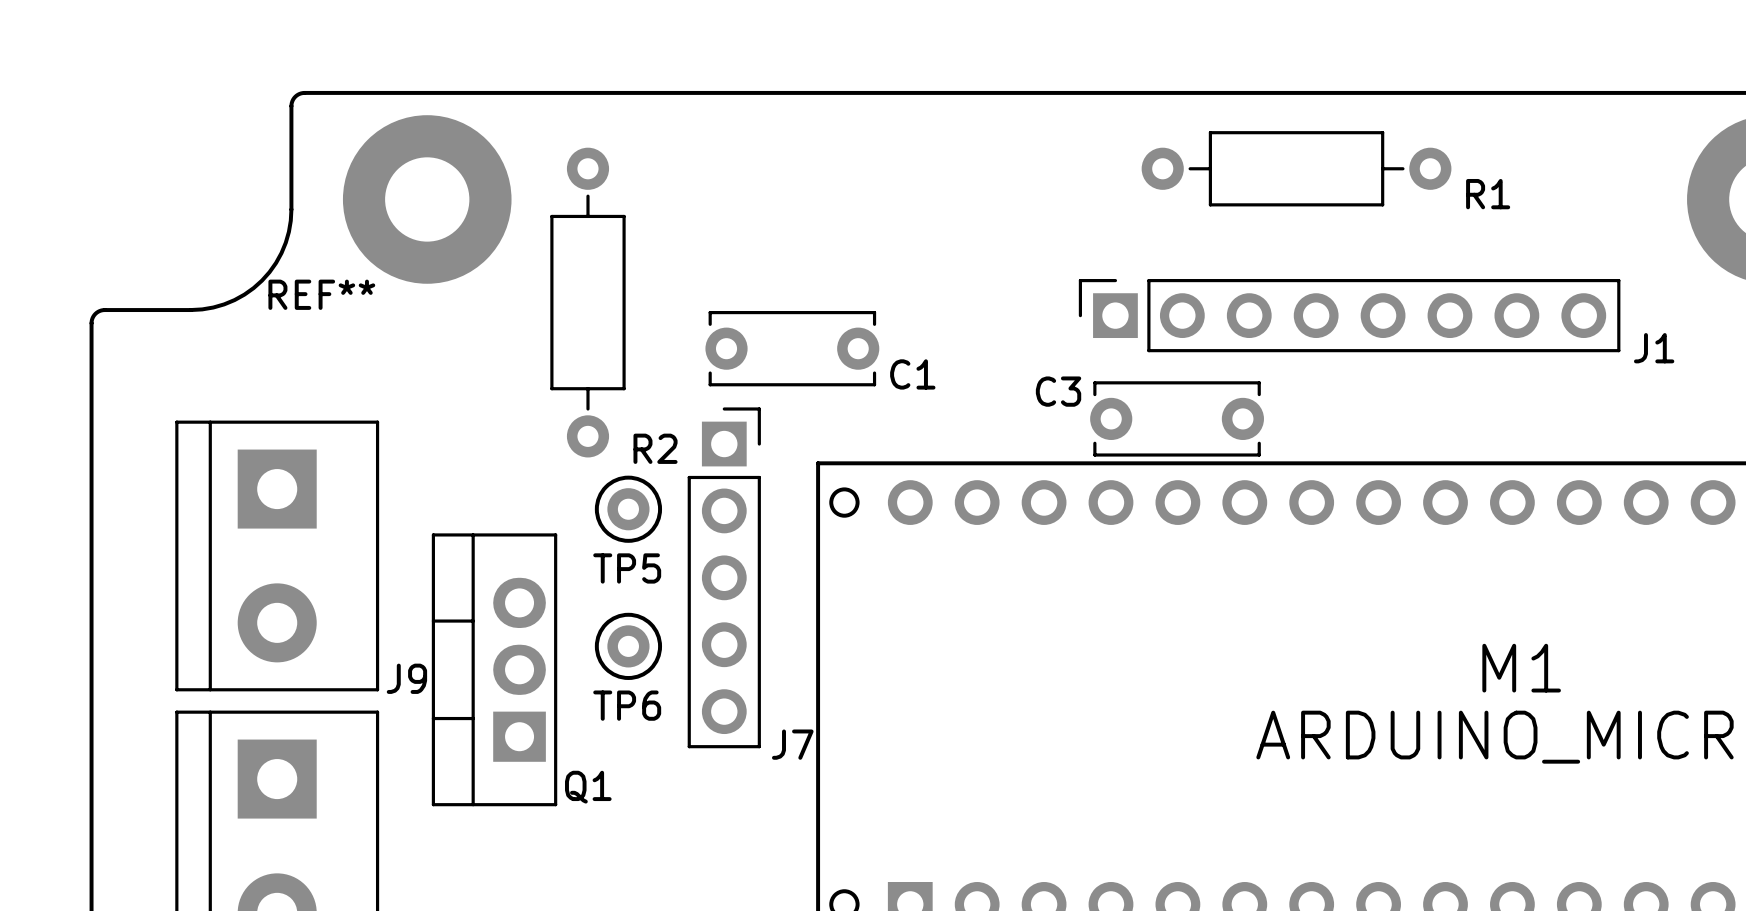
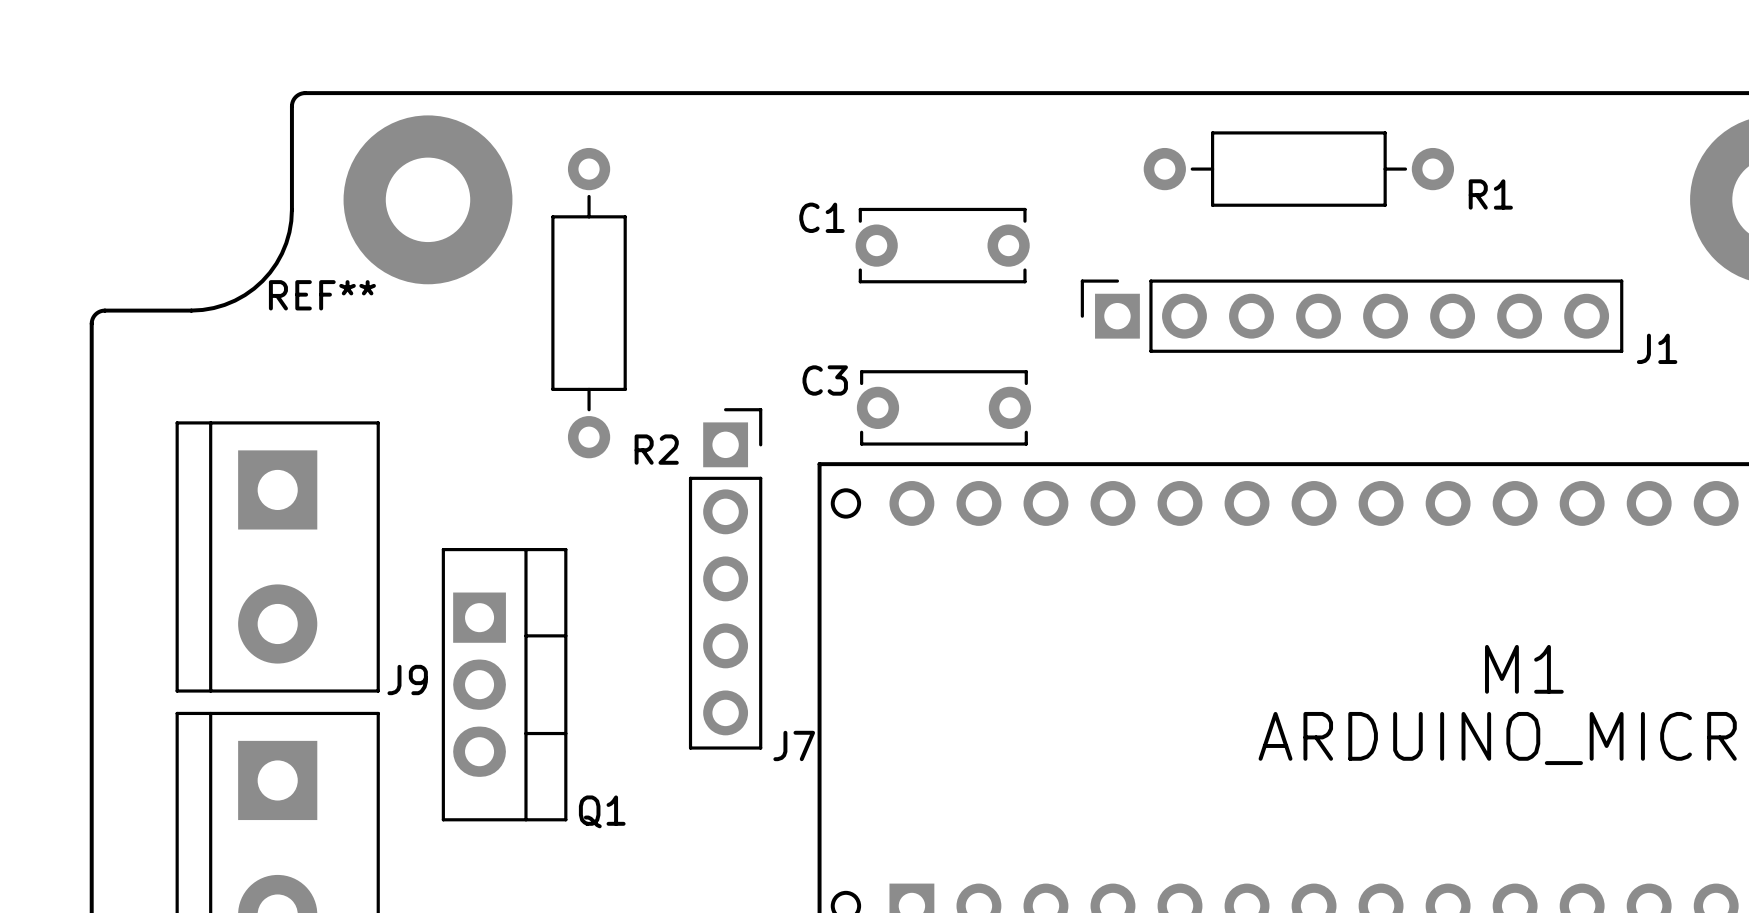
C1 position: (792, 348) -> (942, 245)
C1 name position: C1 (912, 374) -> C1 (822, 217)
C3 position: (1177, 418) -> (943, 407)
TP5: (628, 509) -> none
TP6: (628, 646) -> none
Q1 rotation: 0° (494, 669) -> 180° (504, 684)

